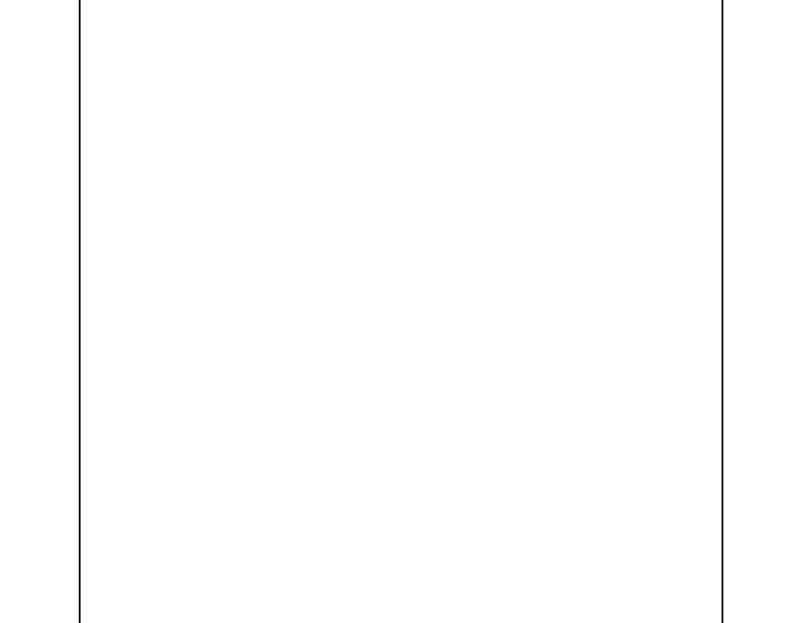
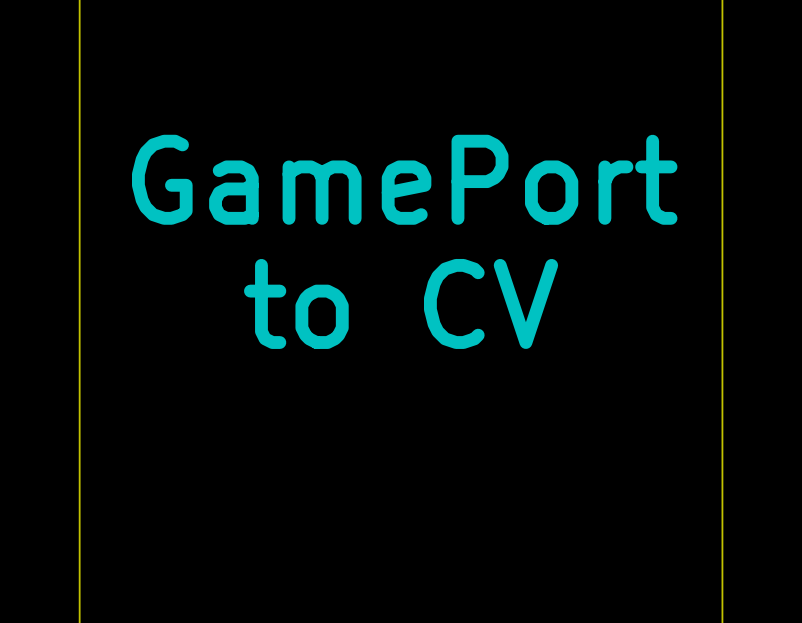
text: none -> GamePort (404, 179)
text: none -> to CV (401, 303)

